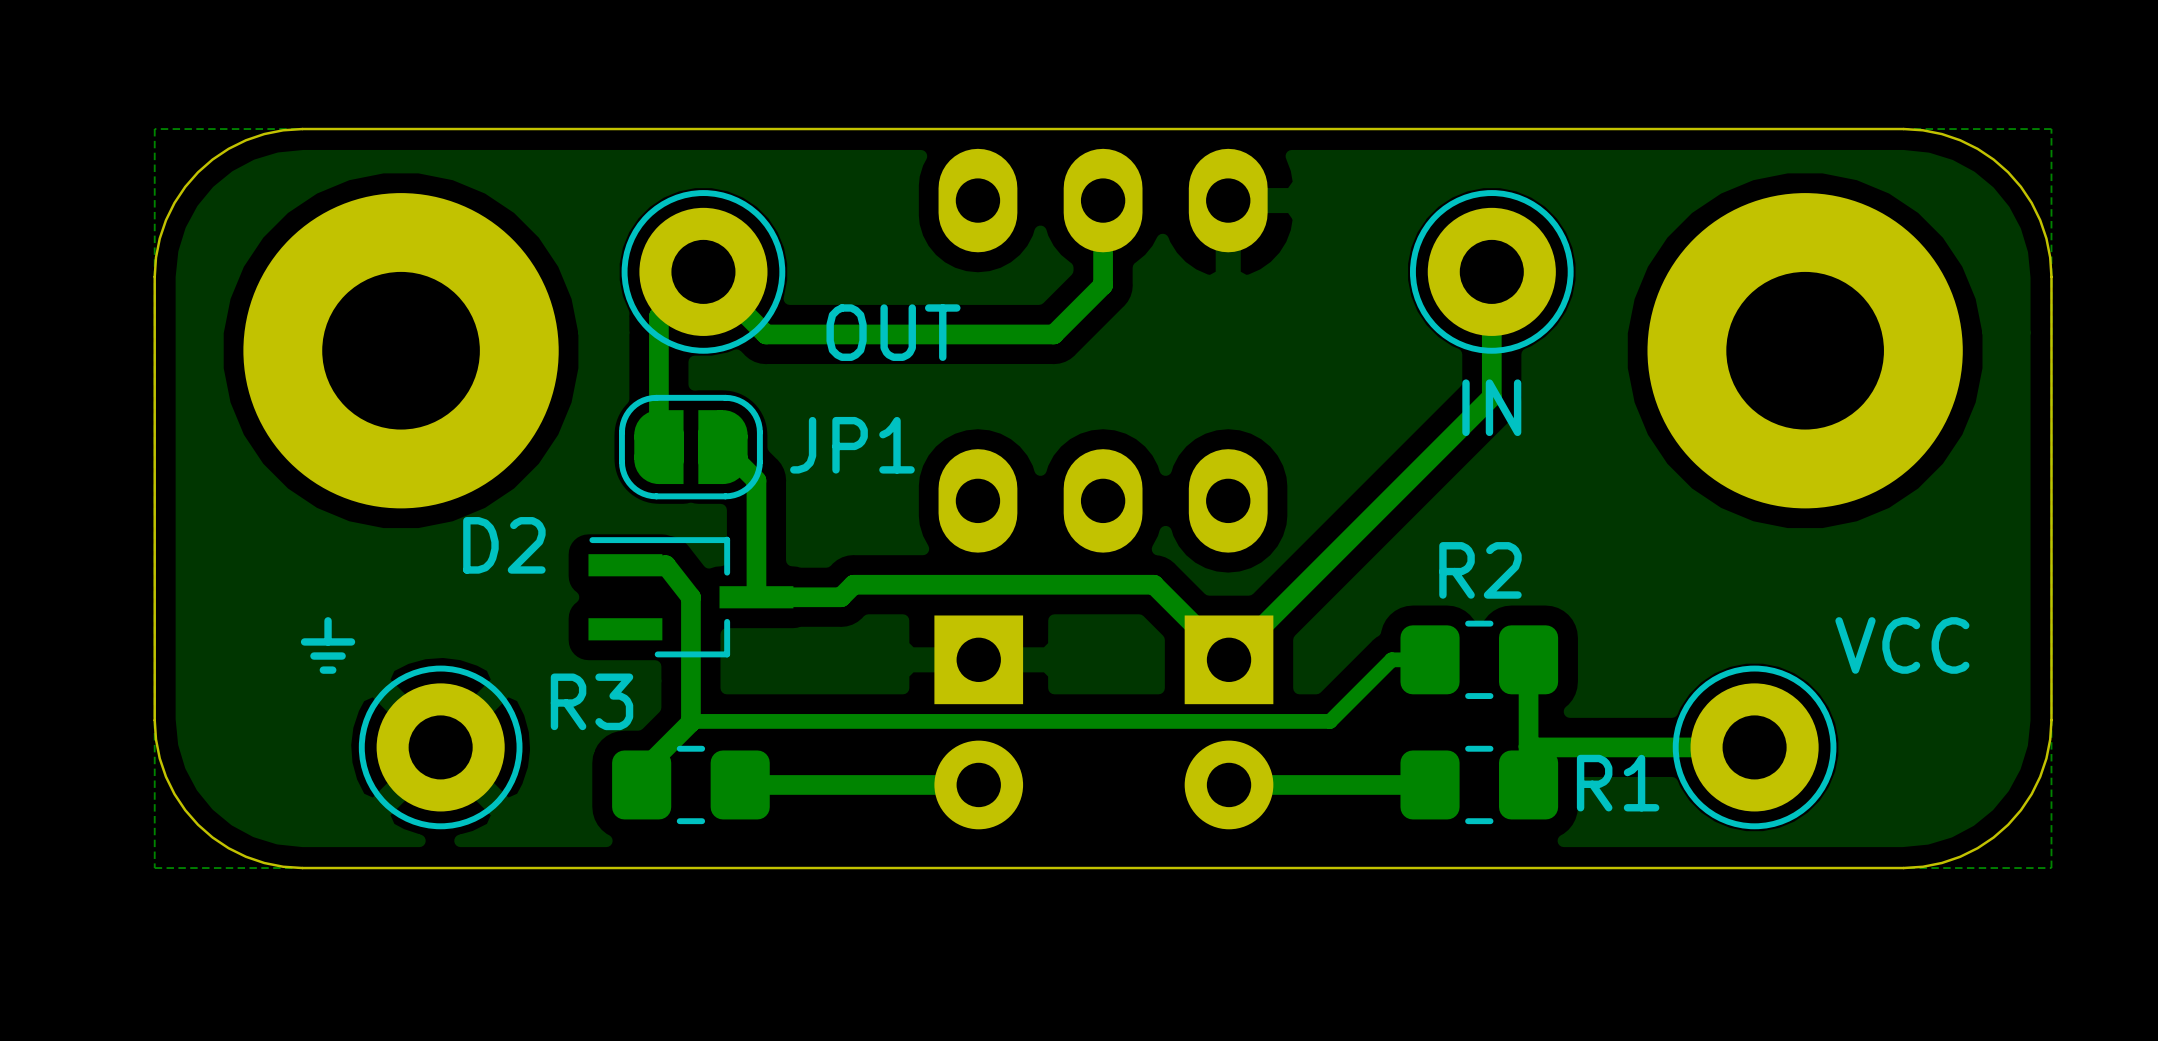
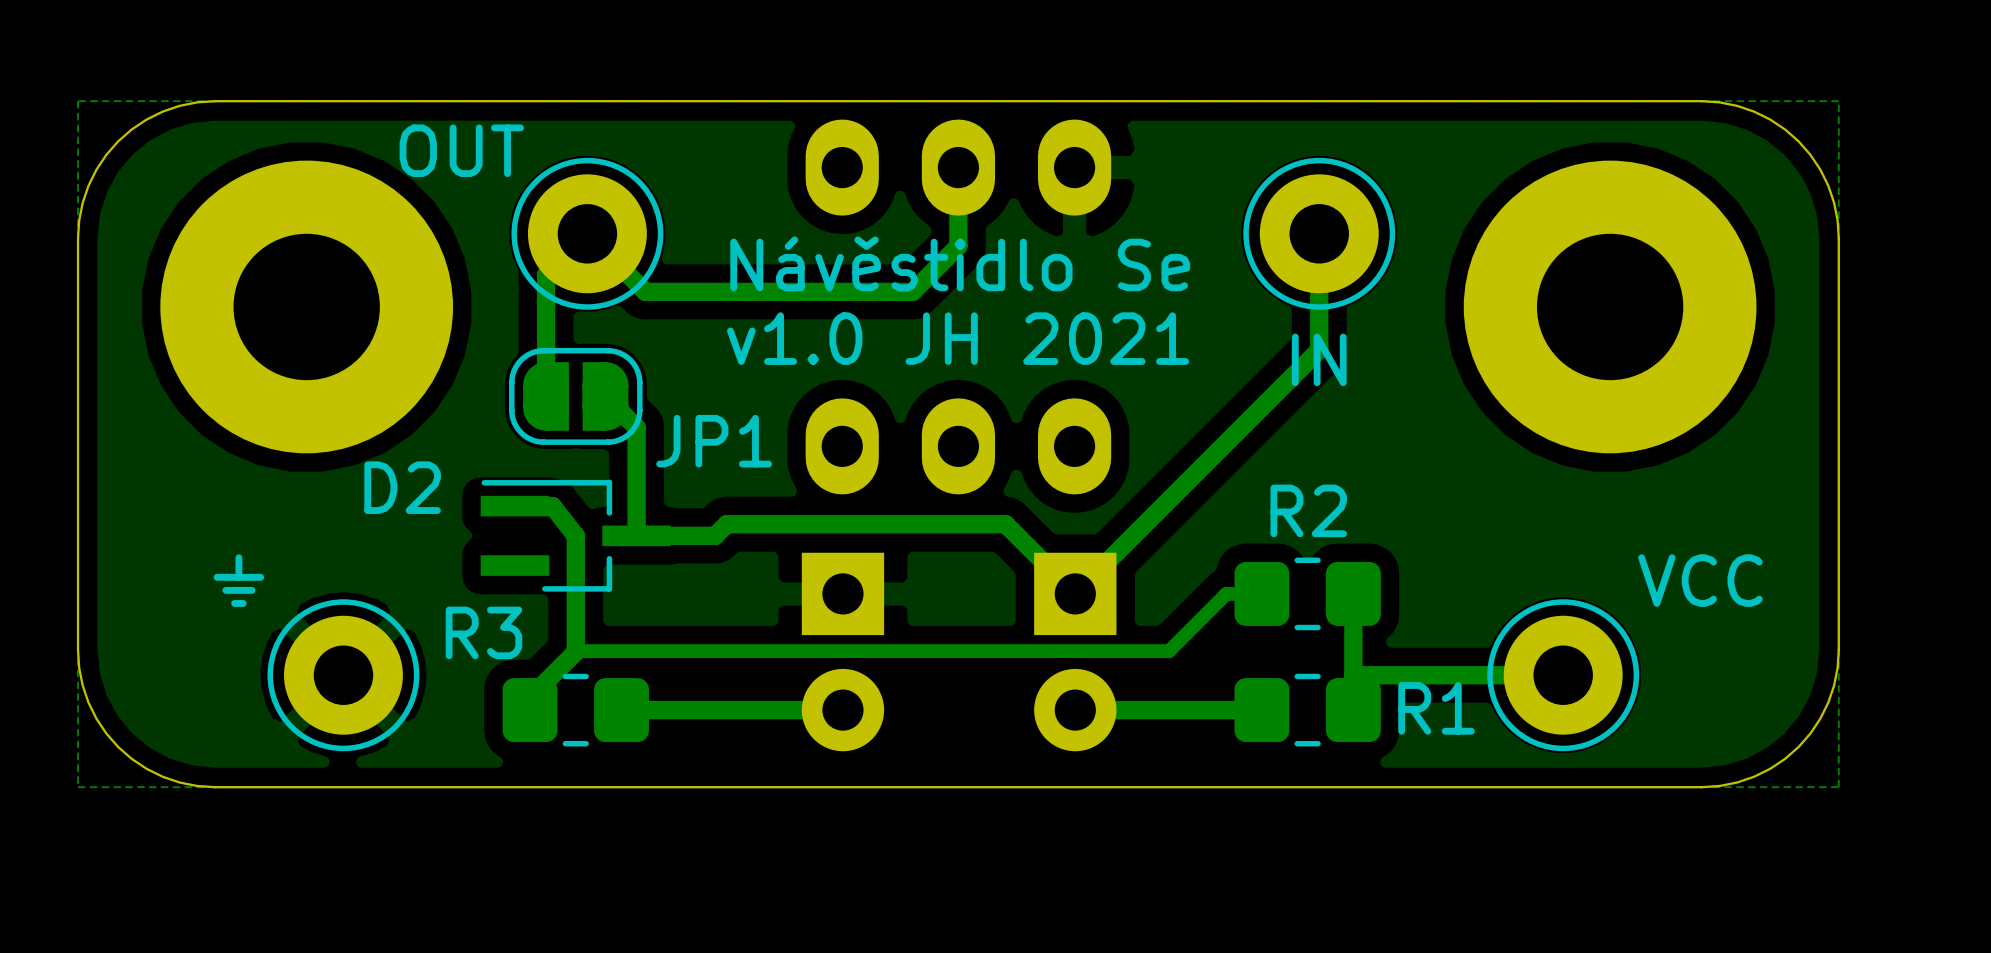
text: none -> Návěstidlo Se (960, 263)
OUT name position: OUT (893, 332) -> OUT (461, 150)
text: none -> v1.0 JH 2021 (958, 338)
JP1 name position: JP1 (852, 445) -> JP1 (714, 441)

